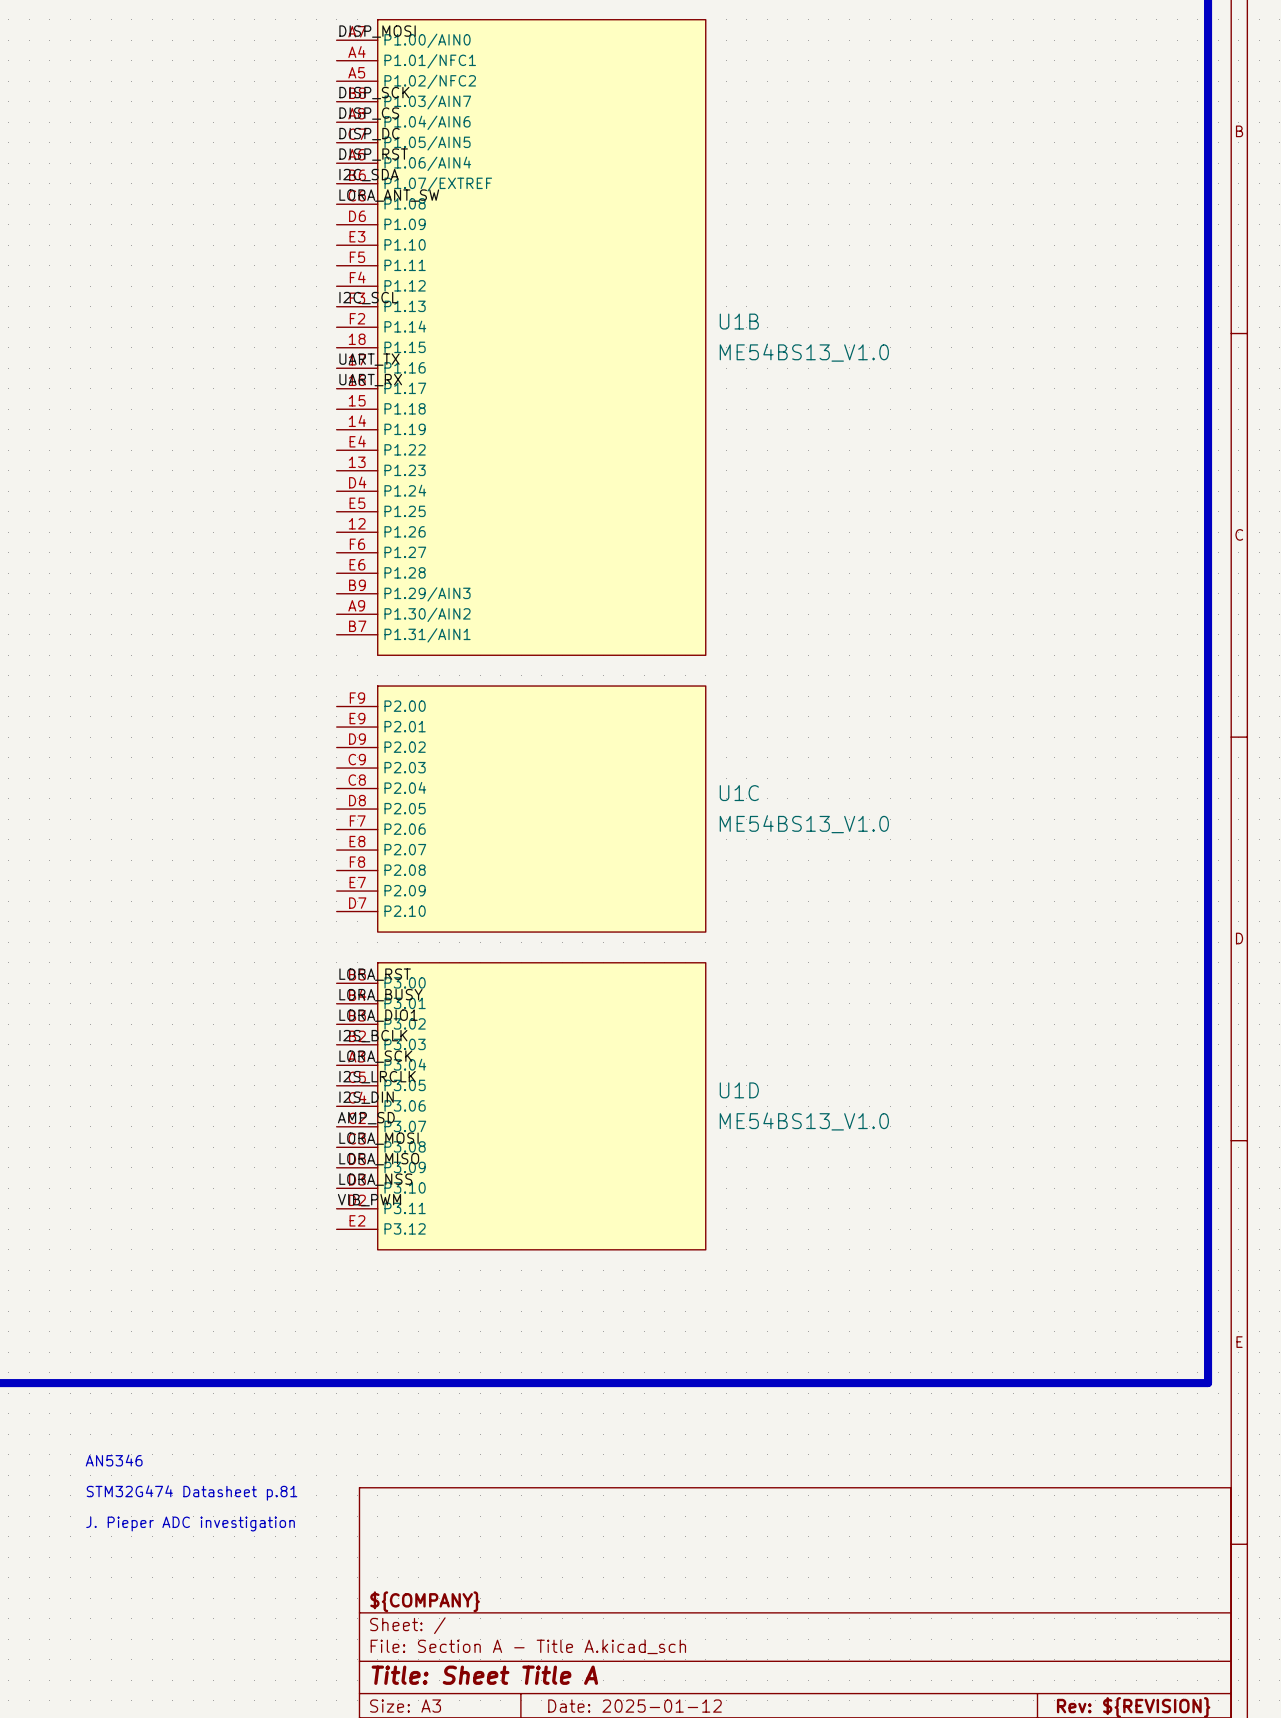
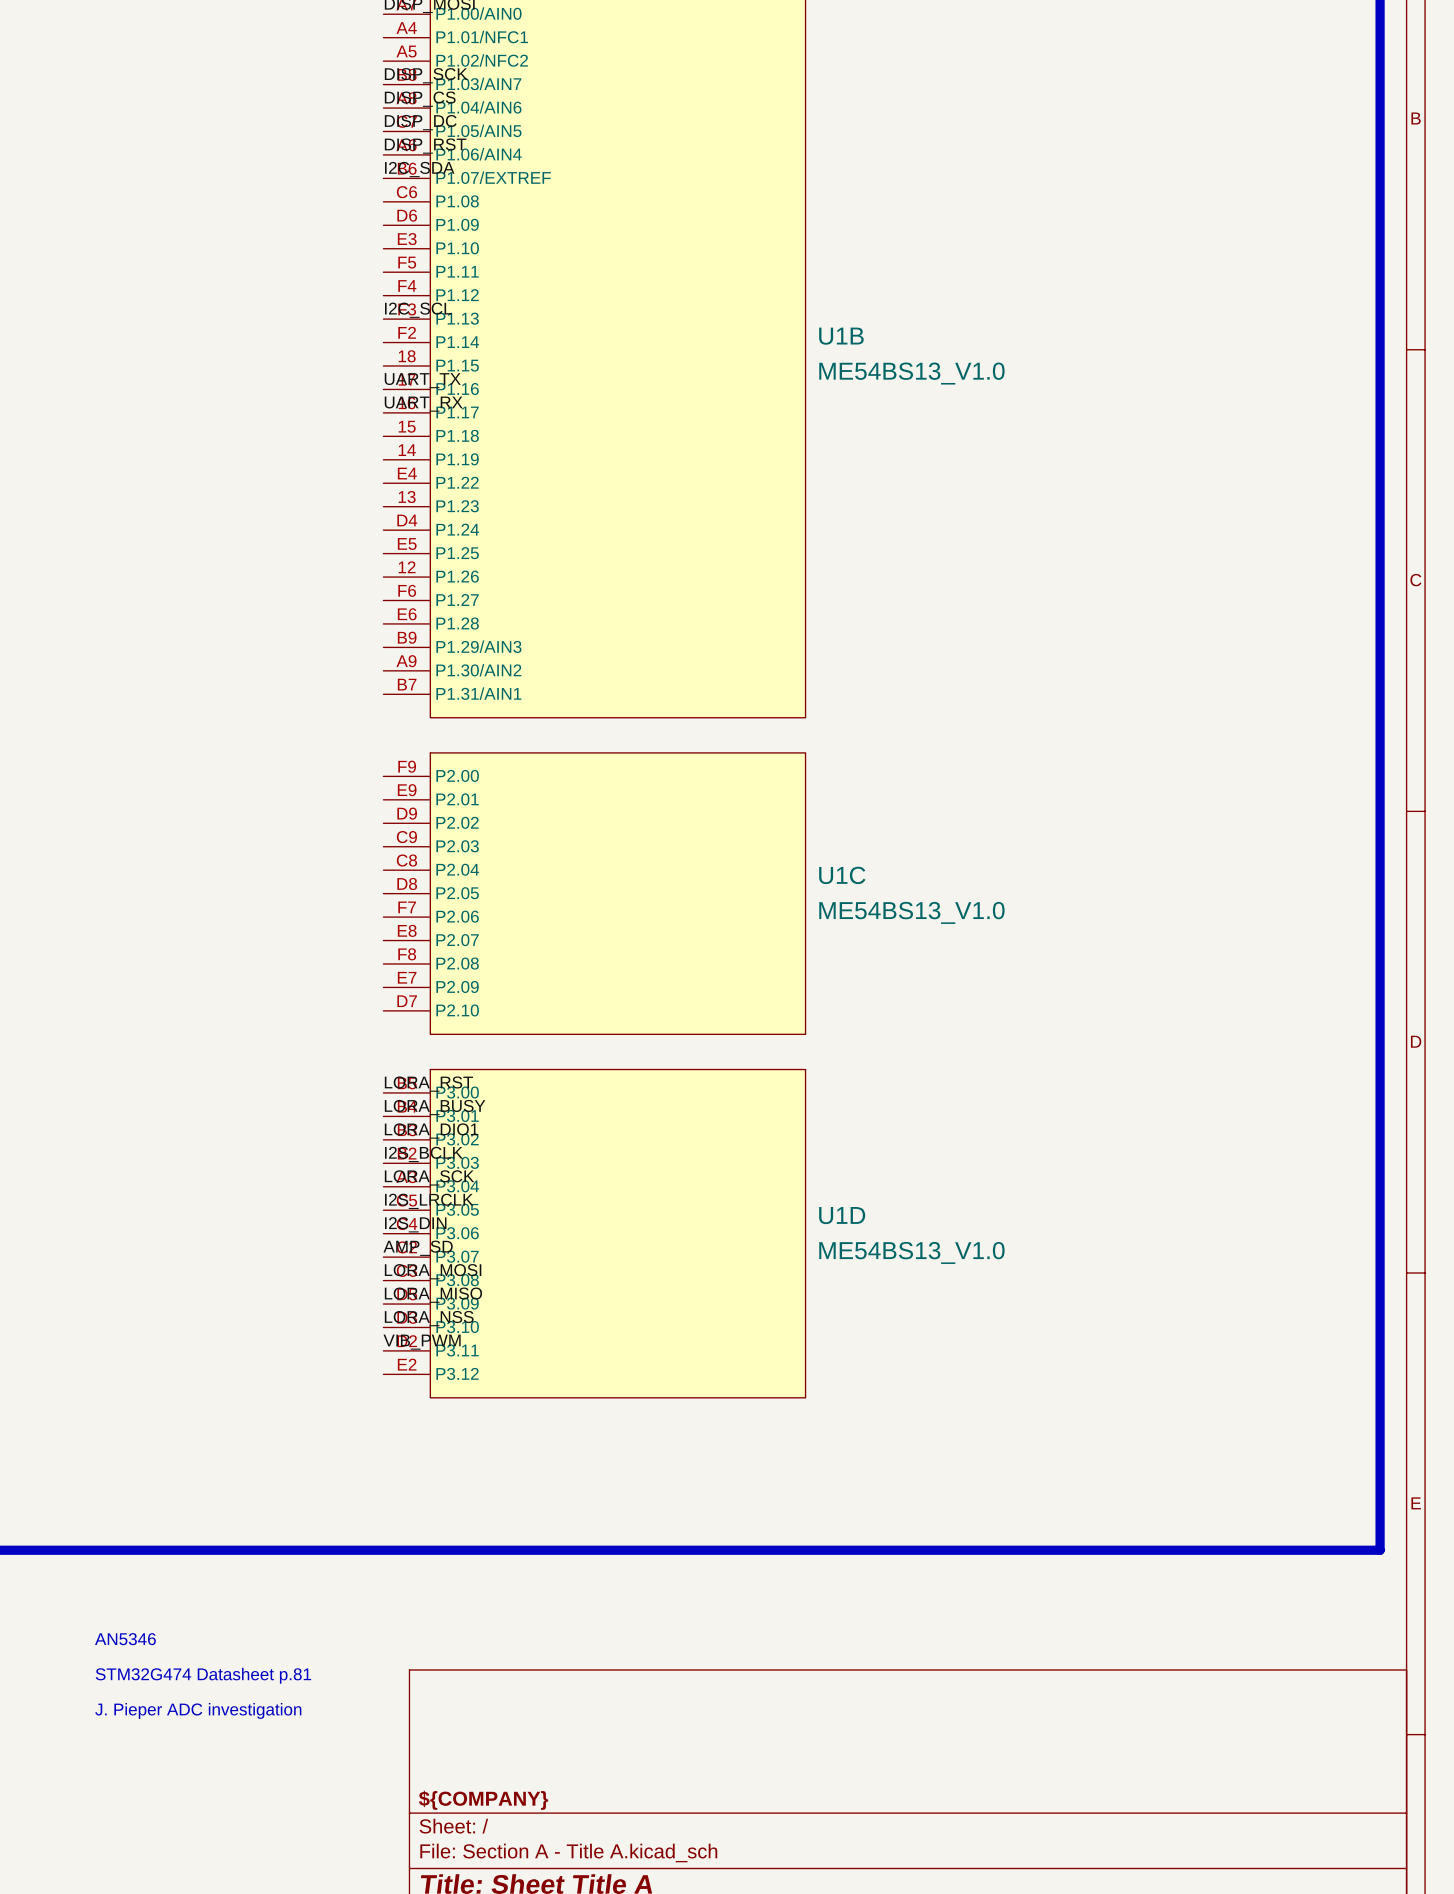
label: LORA_ANT_SW (389, 195) -> none

